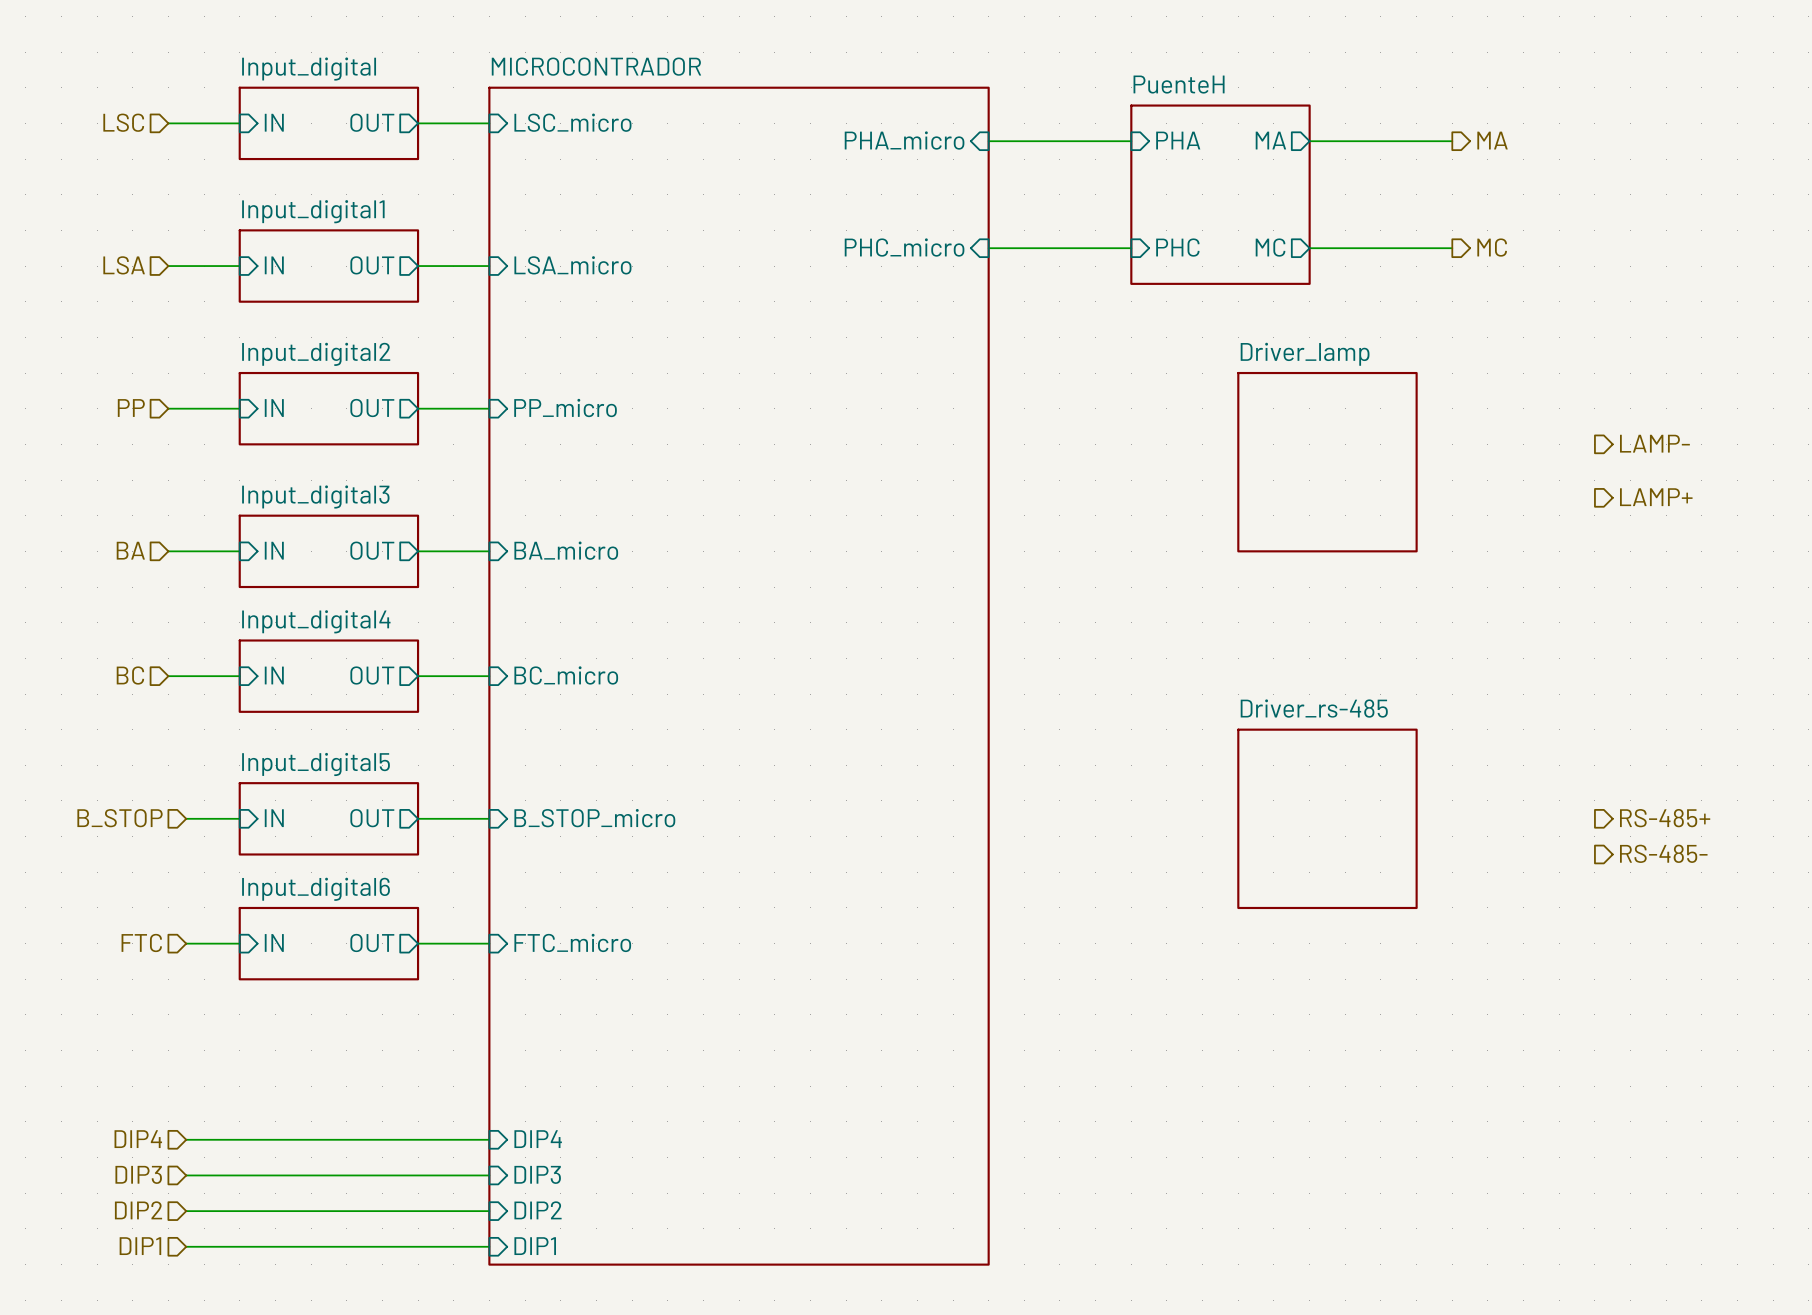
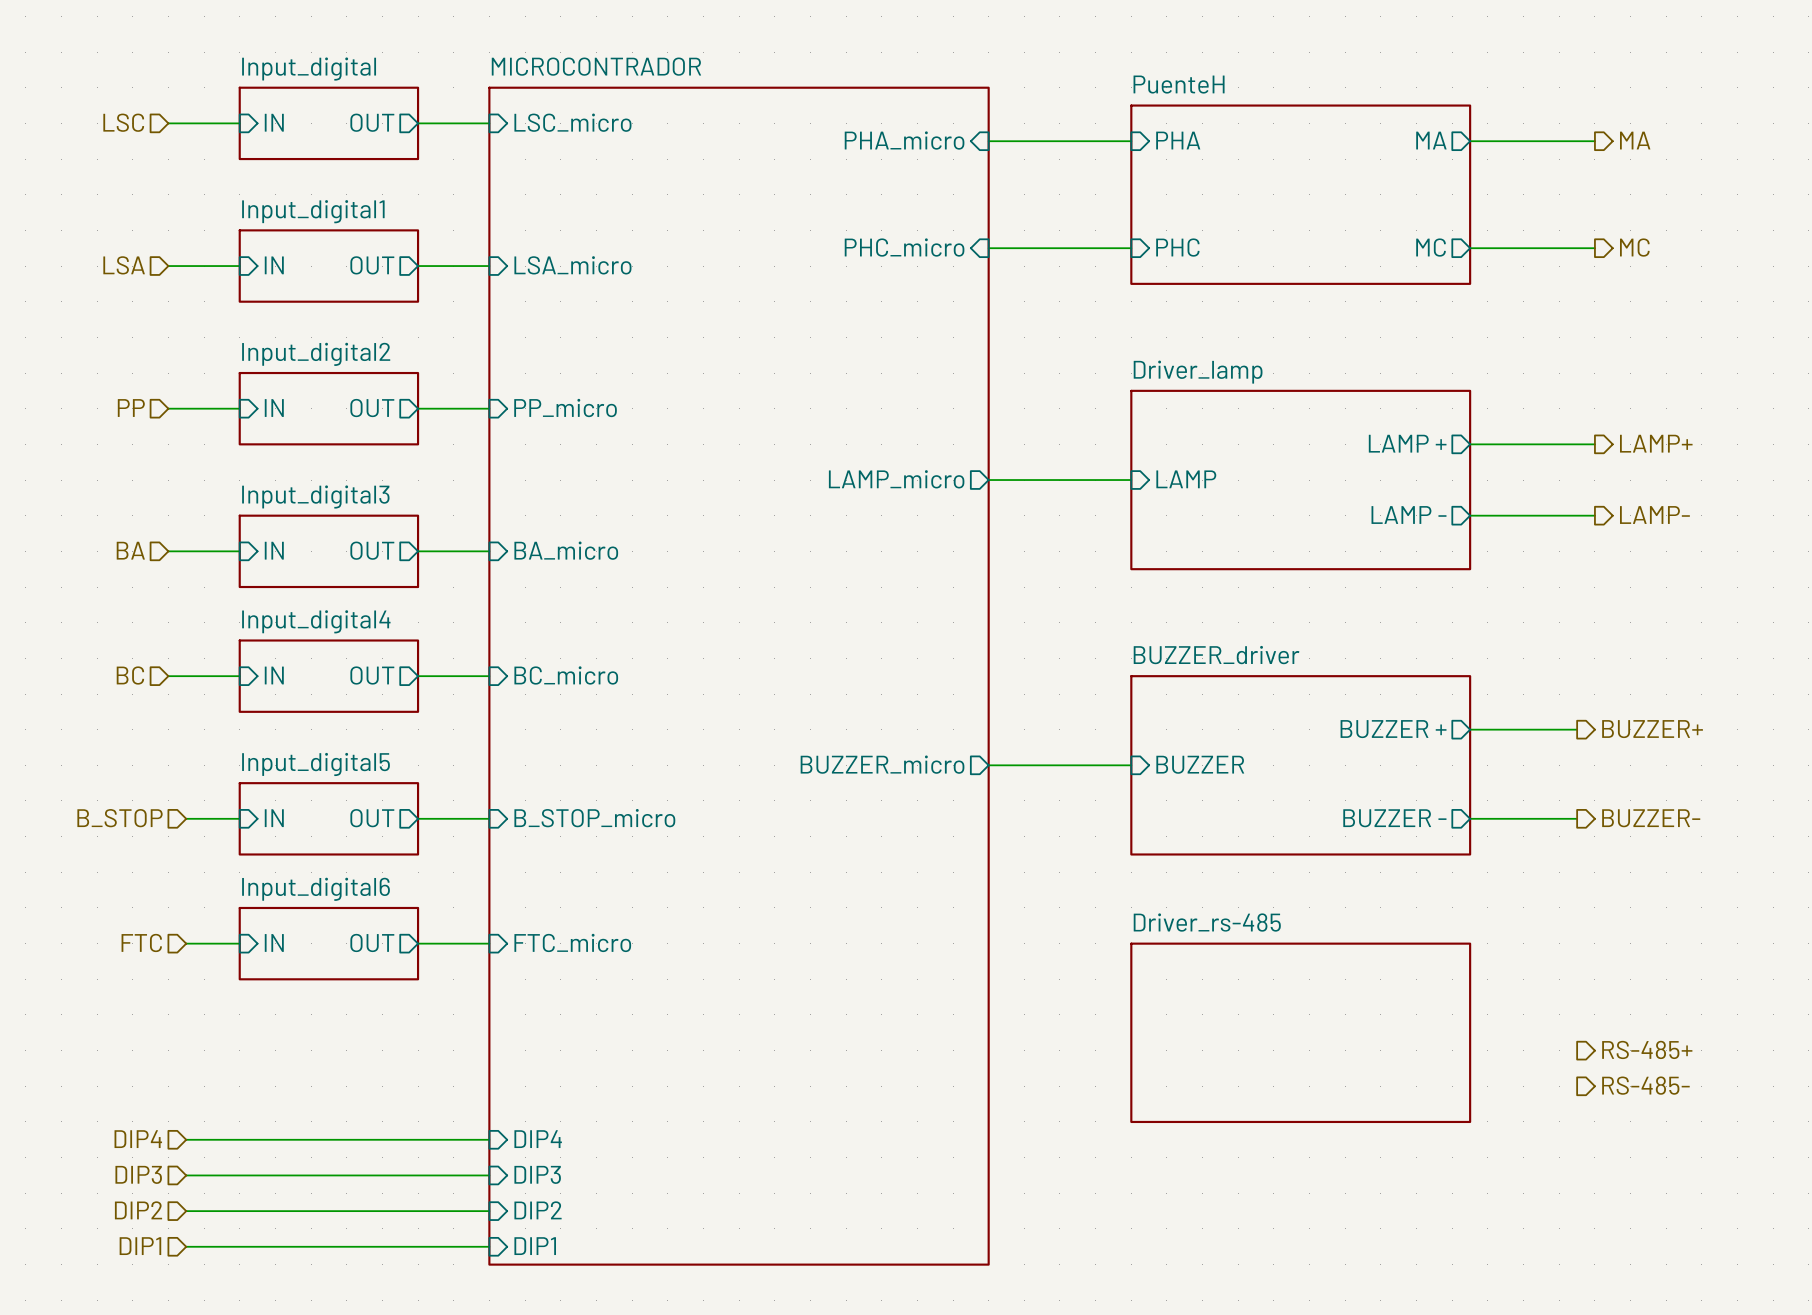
sheet pin position: MA (1270, 140) -> MA (1431, 140)
hierarchical label position: MA (1492, 140) -> MA (1635, 140)
wire: (1309, 141) (1452, 141) -> none
wire: none -> (1470, 141) (1594, 141)
sheet PuenteH: (1220, 194) -> none
sheet PuenteH: none -> (1300, 194)
sheet pin position: MC (1270, 247) -> MC (1431, 247)
hierarchical label position: MC (1492, 247) -> MC (1634, 247)
wire: (1309, 248) (1452, 248) -> none
wire: none -> (1470, 248) (1594, 248)
sheet pin: none -> LAMP + (1407, 443)
hierarchical label: LAMP- (1654, 443) -> LAMP+ (1656, 443)
wire: none -> (1470, 444) (1594, 444)
sheet Driver_lamp: (1327, 462) -> none
sheet pin: none -> LAMP_micro (896, 479)
sheet pin: none -> LAMP (1186, 479)
wire: none -> (988, 480) (1131, 480)
sheet Driver_lamp: none -> (1300, 480)
hierarchical label: LAMP+ (1656, 497) -> LAMP- (1654, 515)
sheet pin: none -> LAMP - (1409, 515)
wire: none -> (1470, 515) (1594, 515)
sheet Driver_rs-485 name position: Driver_rs-485 (1314, 708) -> Driver_rs-485 (1207, 922)
sheet Driver_rs-485 shape: [1237, 728, 1418, 910] -> [1130, 942, 1472, 1124]
sheet pin: none -> BUZZER + (1393, 729)
wire: none -> (1470, 729) (1577, 729)
hierarchical label: none -> BUZZER+ (1652, 729)
sheet pin: none -> BUZZER_micro (882, 764)
sheet pin: none -> BUZZER (1200, 764)
wire: none -> (988, 765) (1131, 765)
sheet BUZZER_driver: none -> (1300, 765)
sheet pin: none -> BUZZER - (1394, 818)
wire: none -> (1470, 818) (1577, 818)
hierarchical label: none -> BUZZER- (1651, 818)
hierarchical label position: RS-485+ (1665, 818) -> RS-485+ (1647, 1049)
hierarchical label position: RS-485- (1663, 853) -> RS-485- (1645, 1085)

